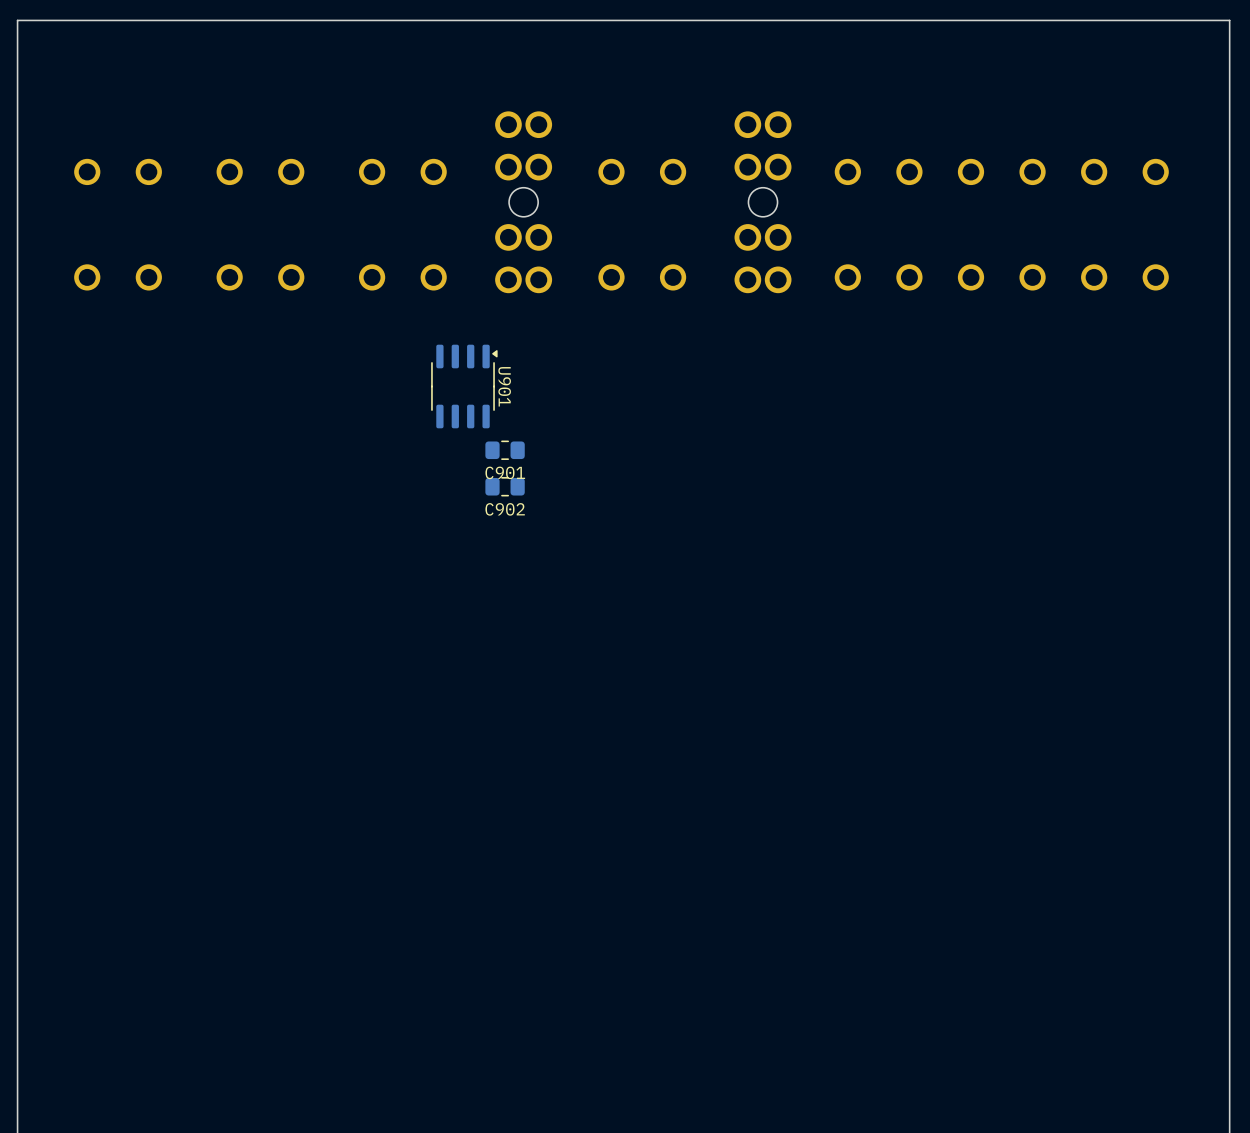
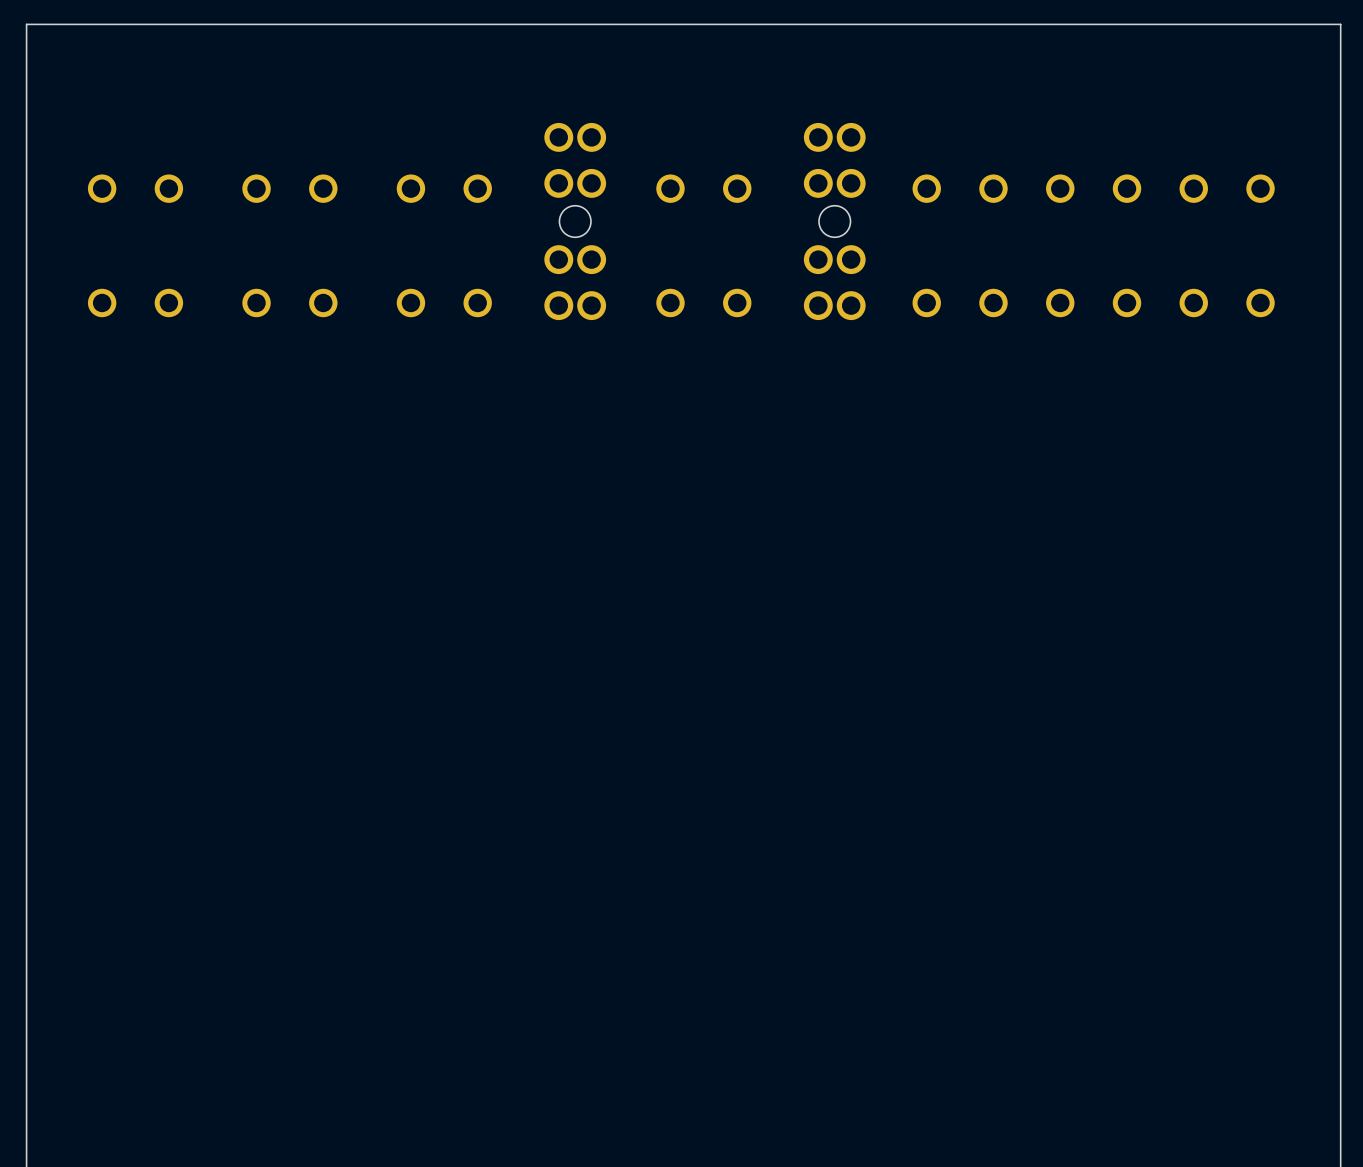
U901: (464, 386) -> none
C901: (505, 450) -> none
C902: (505, 486) -> none

